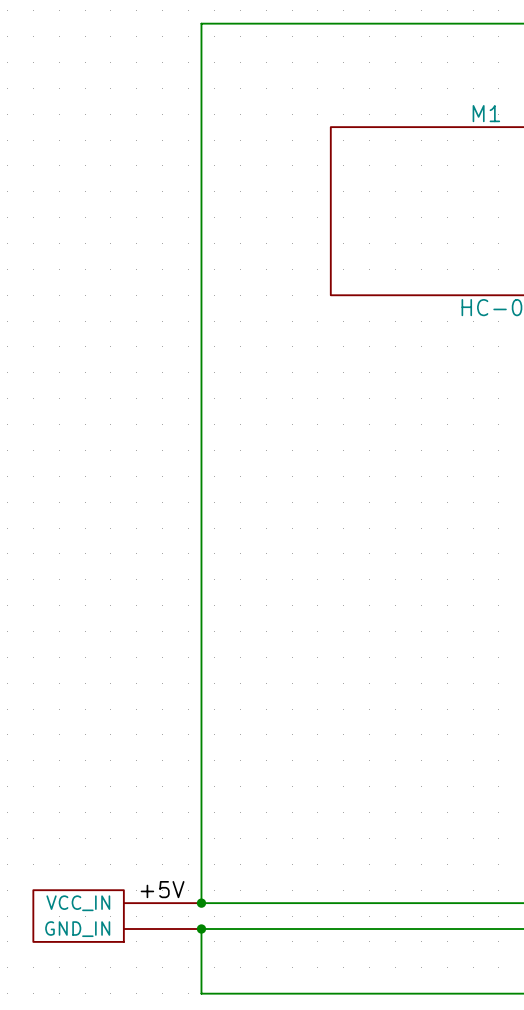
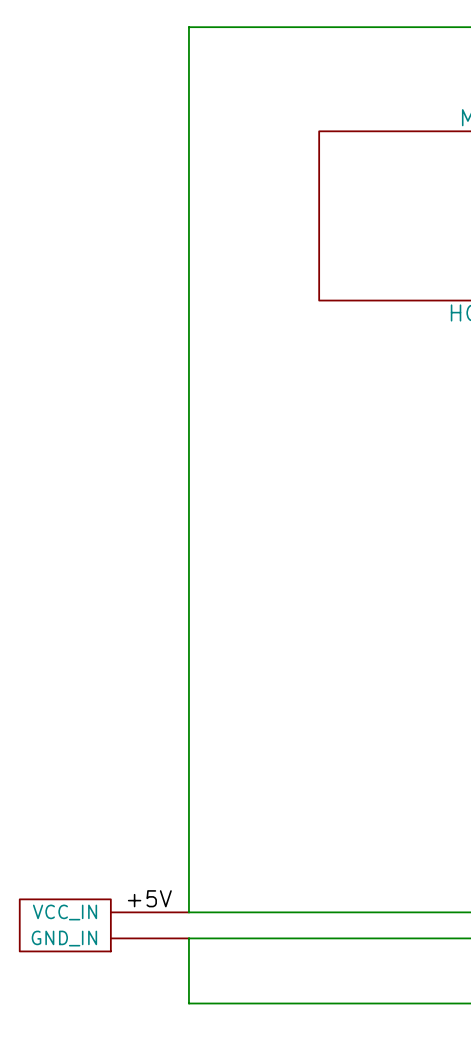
junction: (201, 903) -> none
junction: (201, 929) -> none

